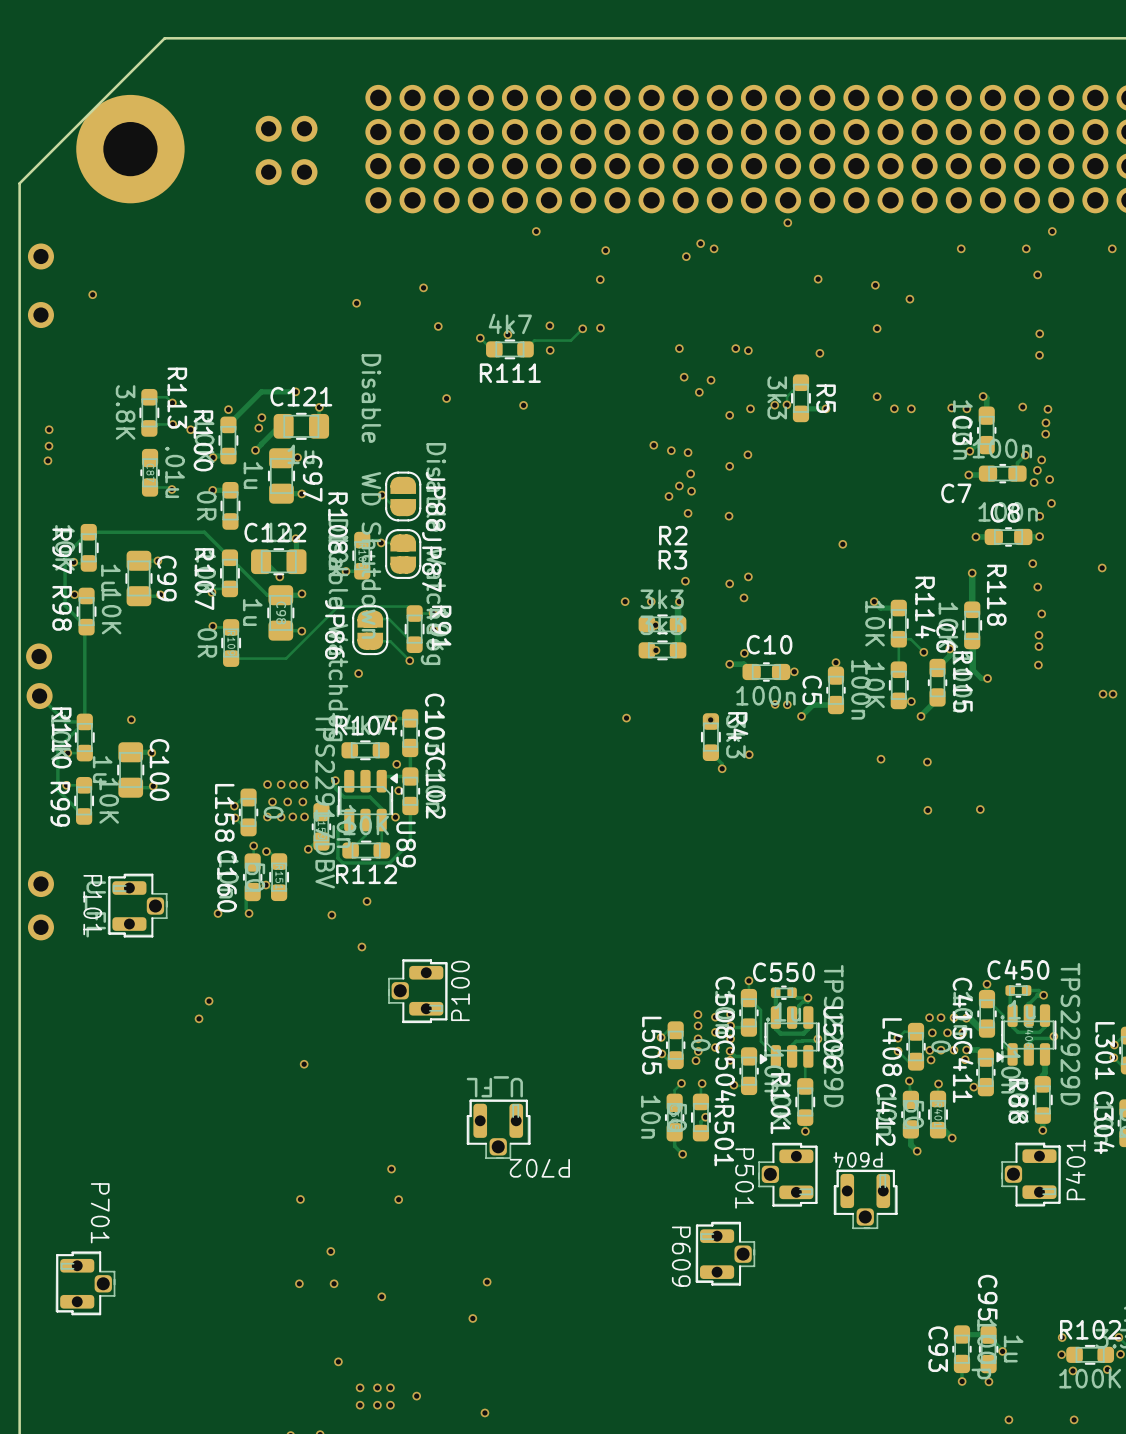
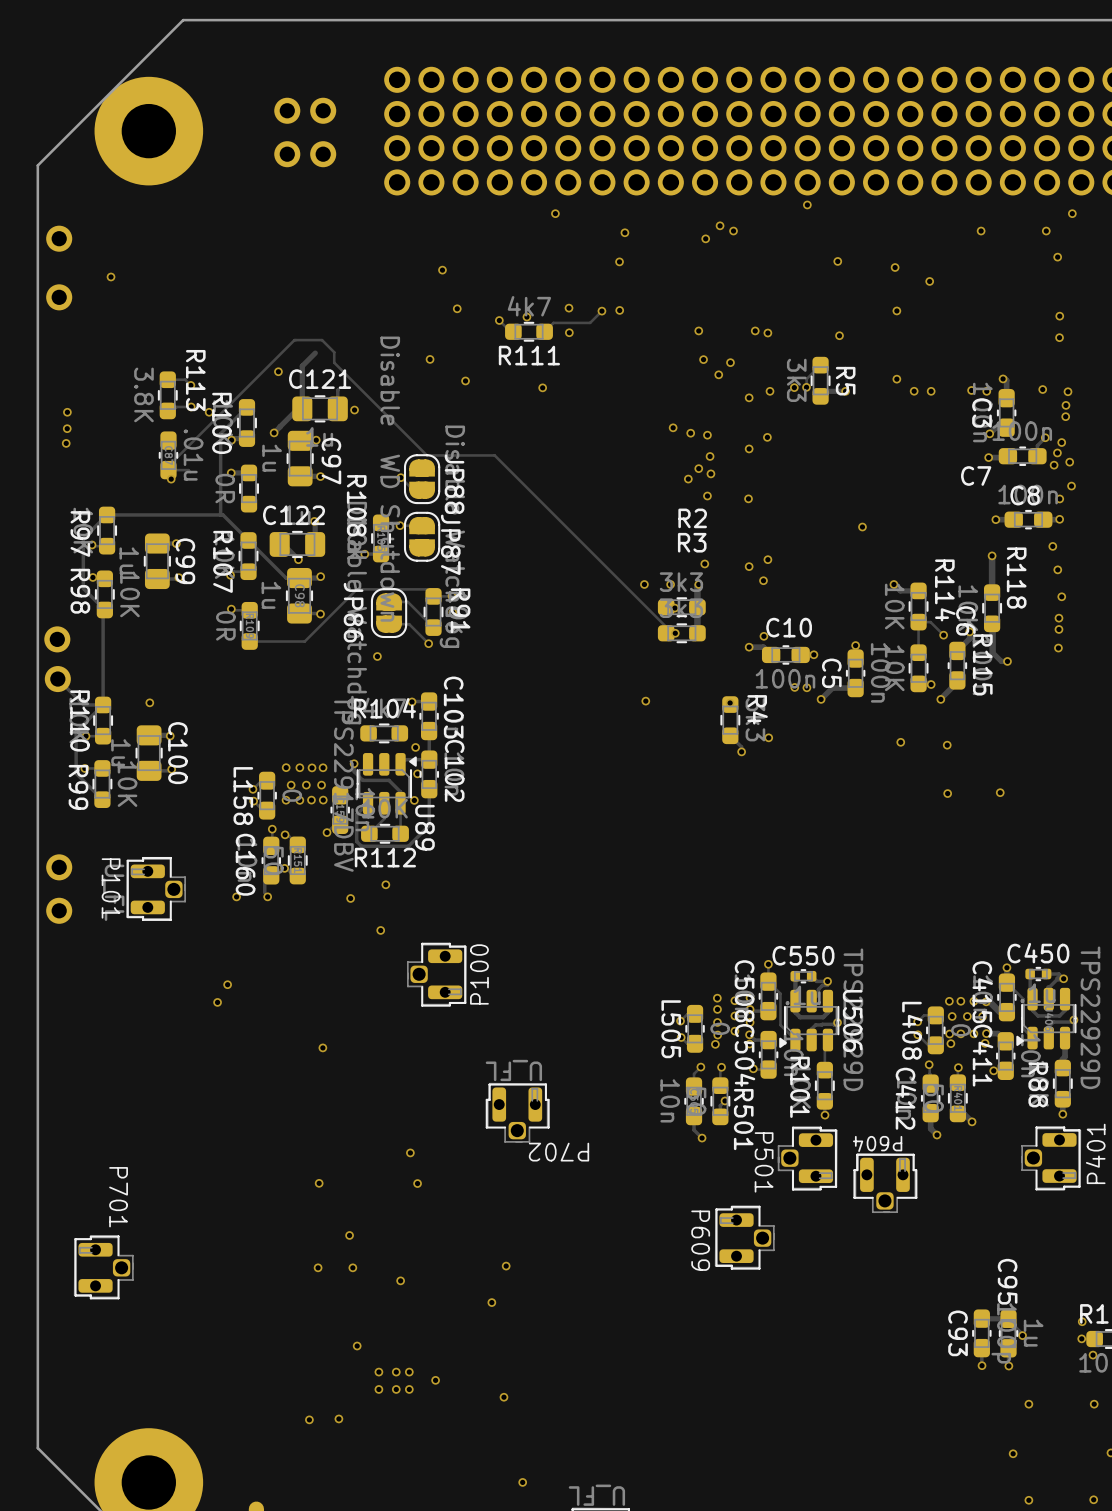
via: (356, 303) -> none
track: none -> (315, 353) (302, 366) (302, 408)
via: none -> (430, 359)
via: none -> (278, 371)
track: (295, 391) (261, 391) (228, 424) -> (220, 514) (220, 433) (246, 407)
via: (295, 391) -> none
via position: (319, 407) -> (354, 410)
via: (228, 409) -> none
via: (261, 417) -> none
via: (258, 428) -> none
via position: (171, 489) -> (171, 479)
track: none -> (171, 479) (171, 463) (294, 340) (322, 340) (334, 352) (334, 362) (426, 455) (494, 455) (672, 633) (675, 633)

